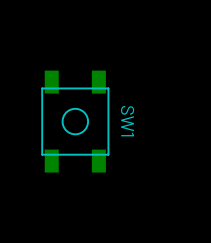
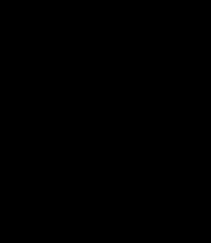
SW1: (75, 121) -> none

